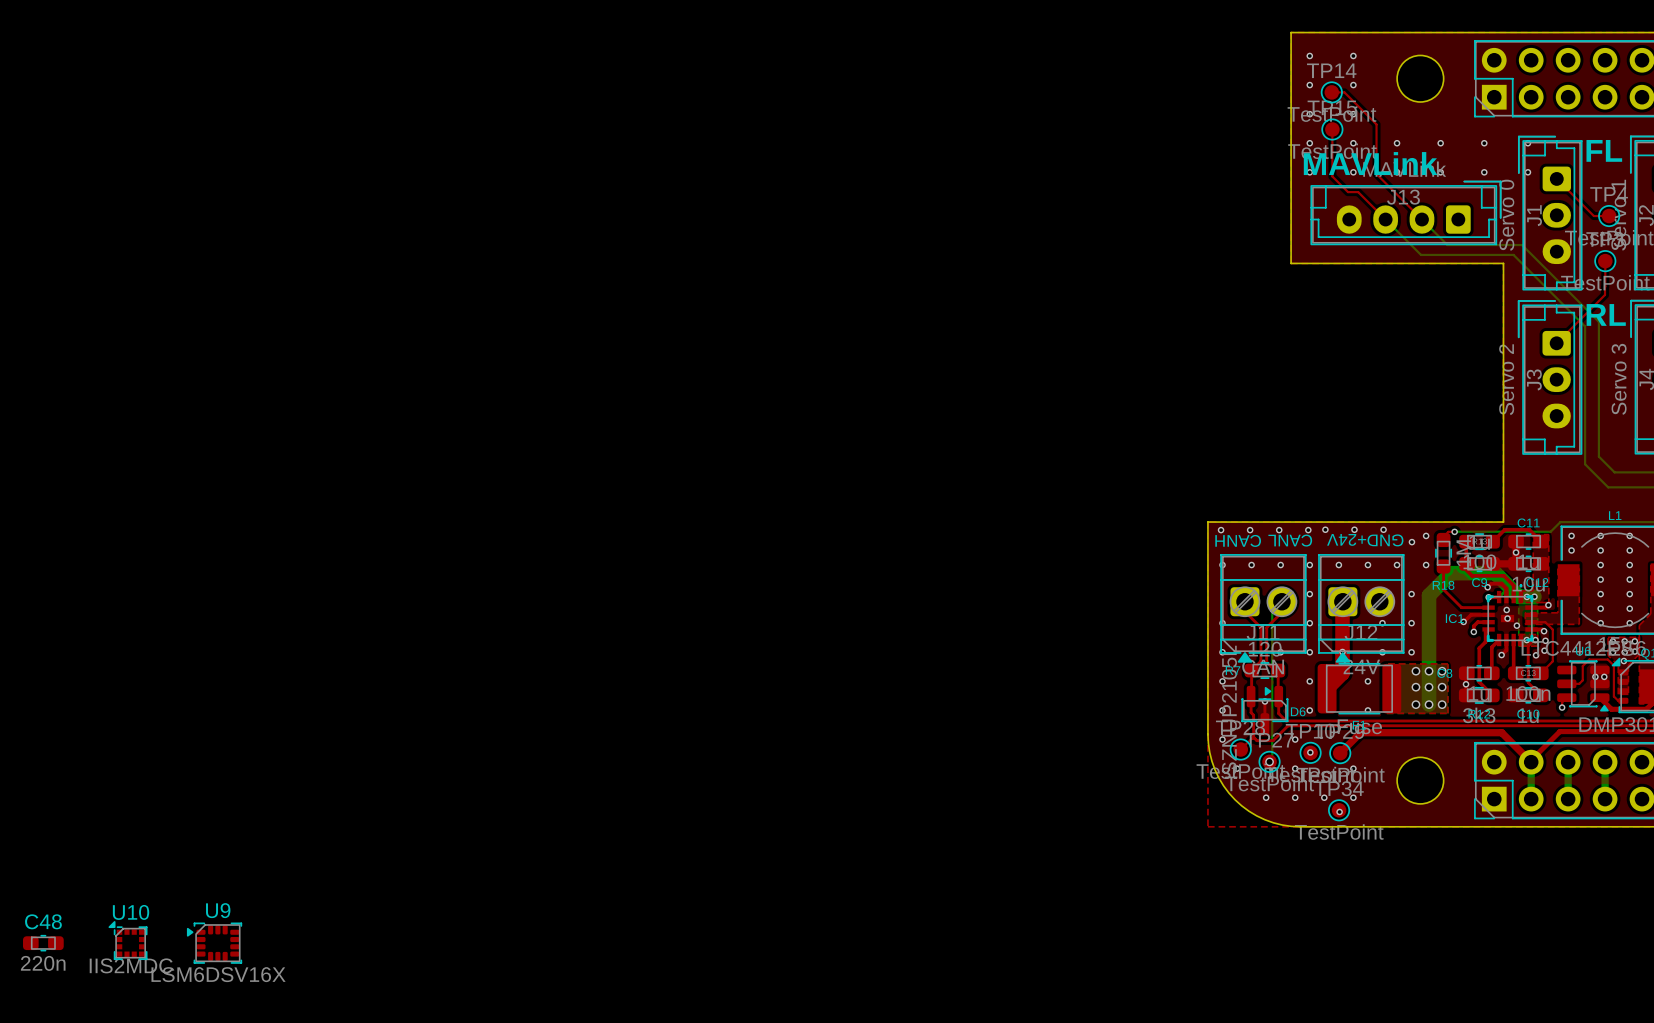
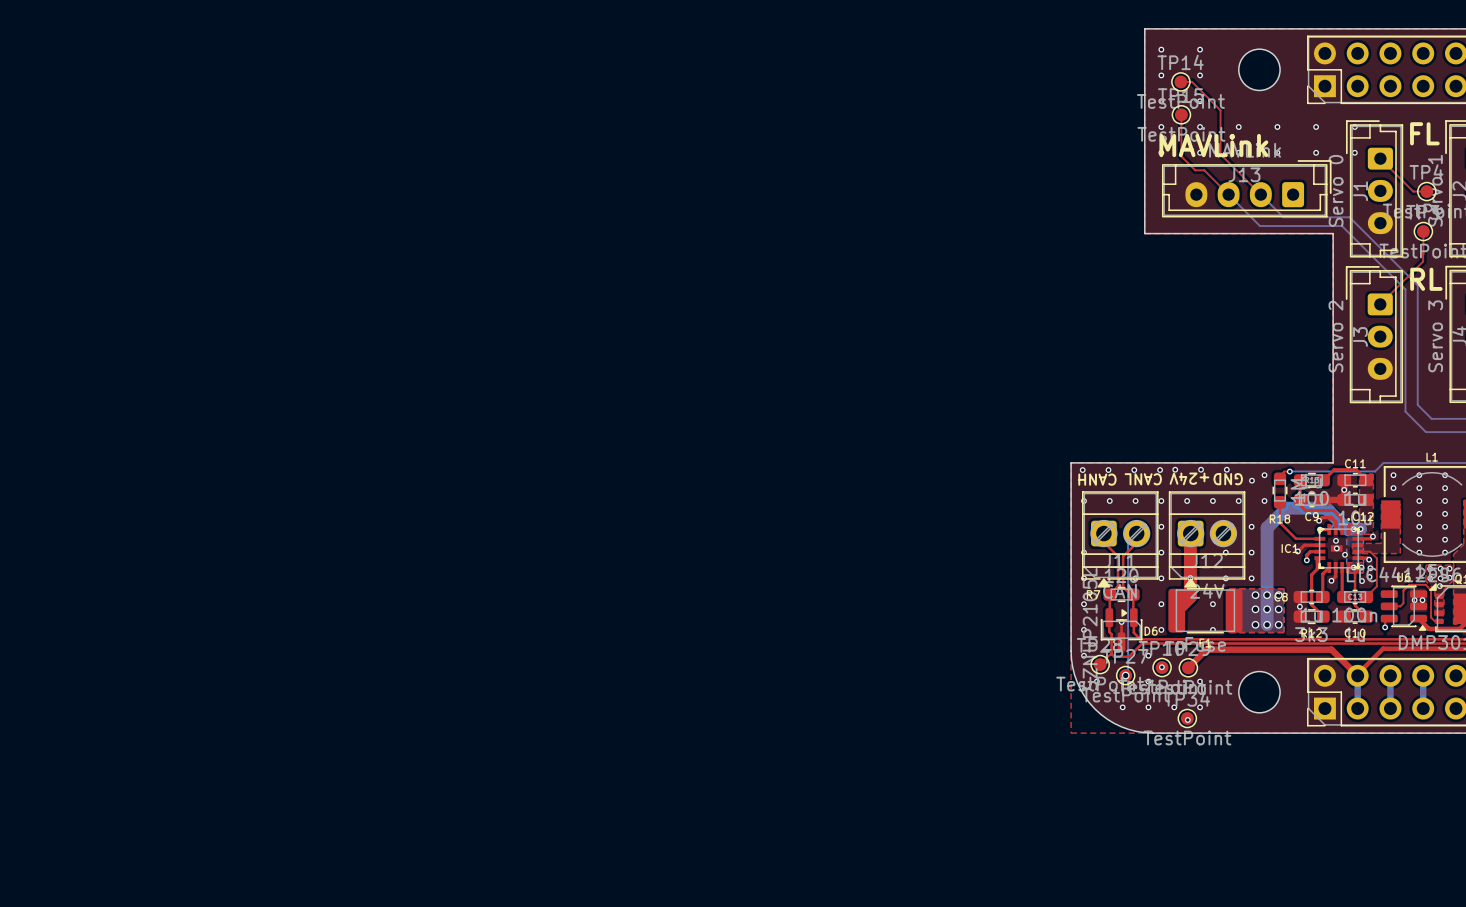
U10: IIS2MDC (128, 940) -> none
C48: 220n (43, 943) -> none
U9: LSM6DSV16X (214, 943) -> none

